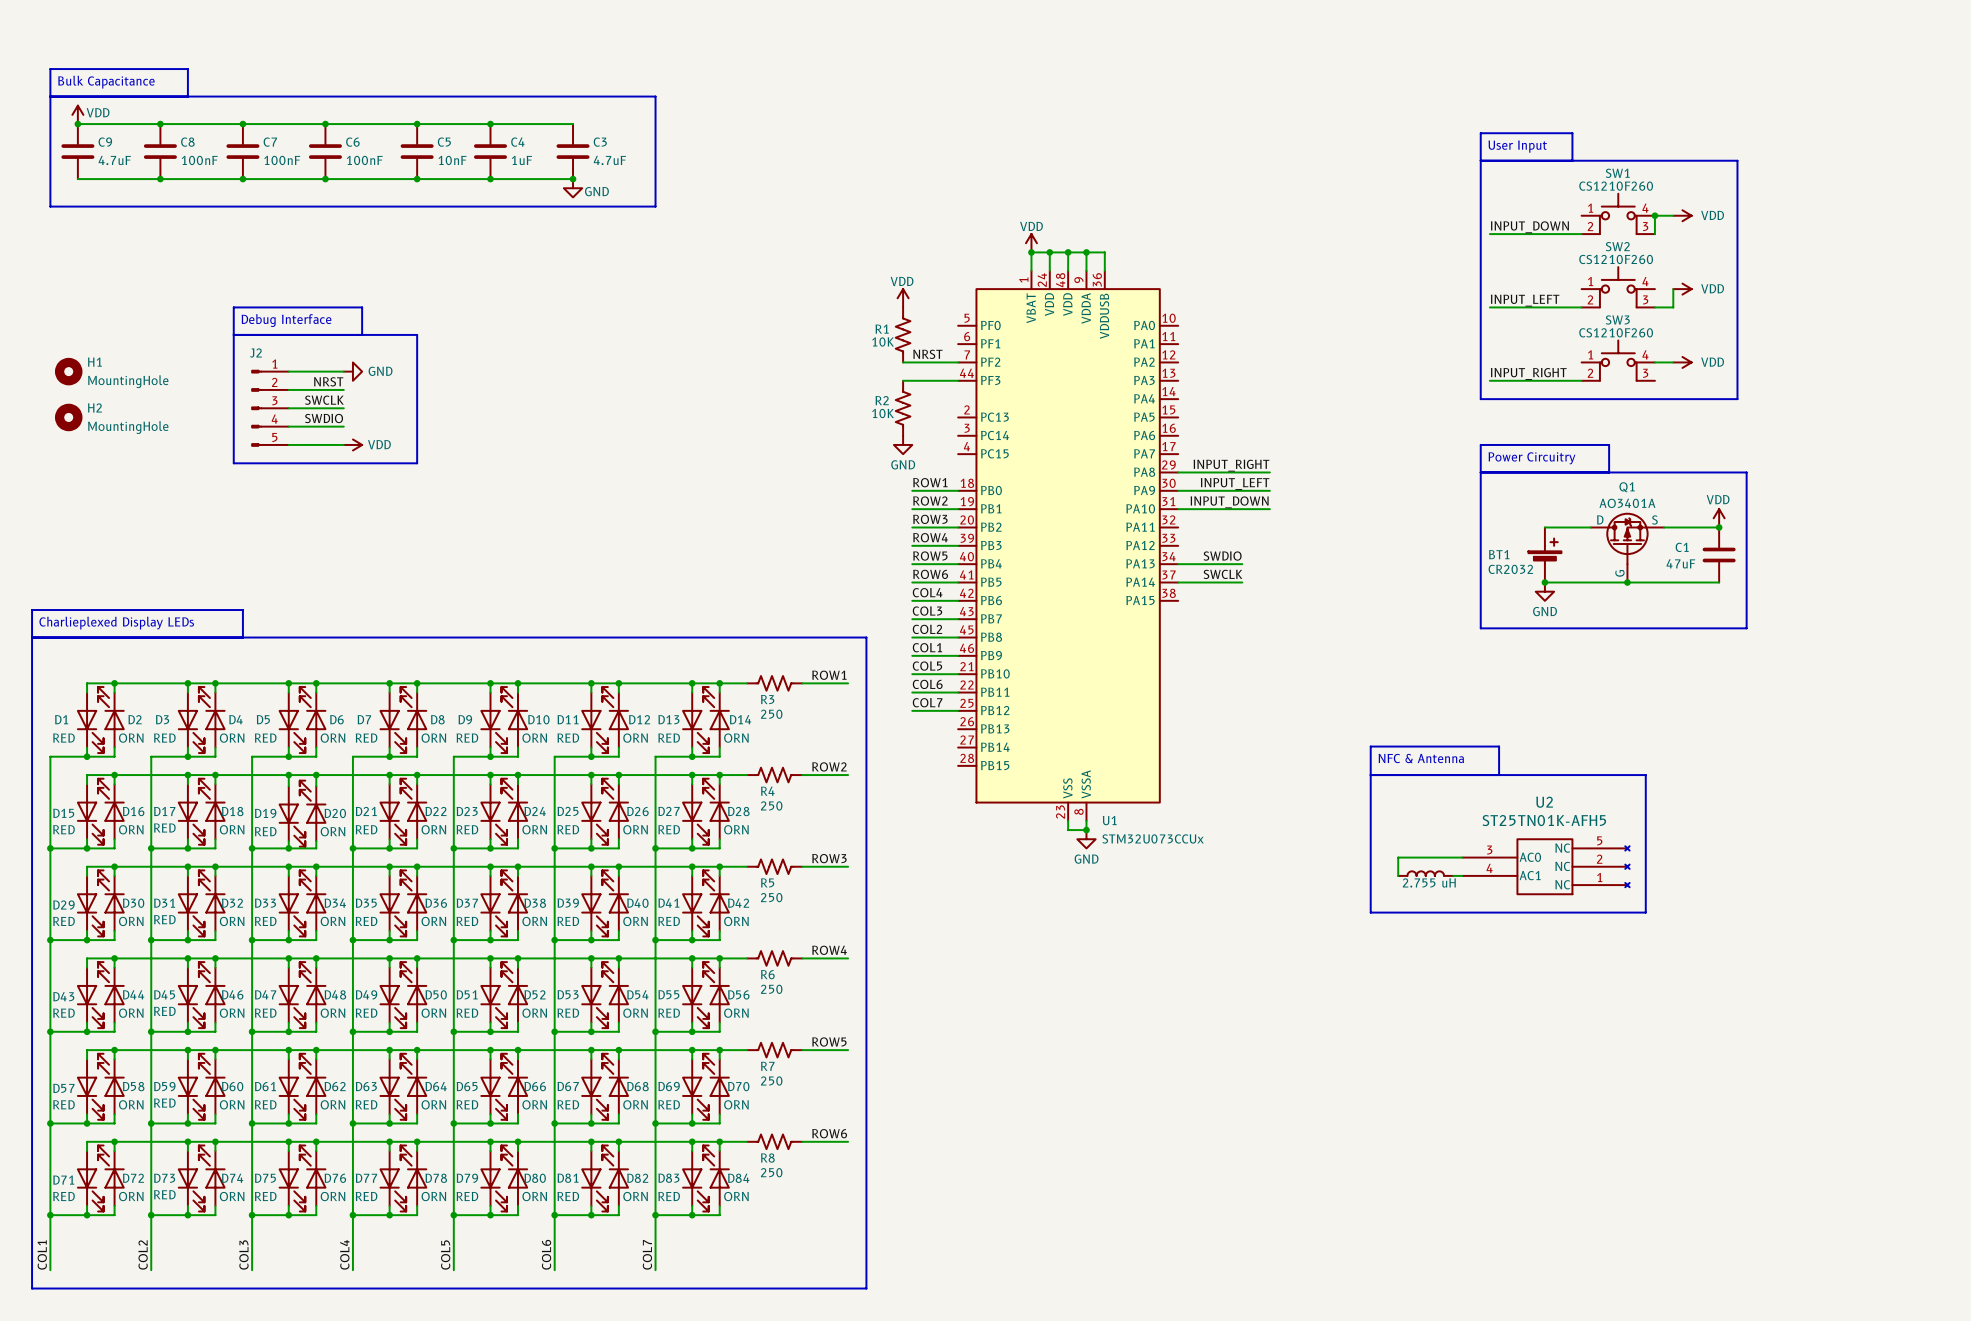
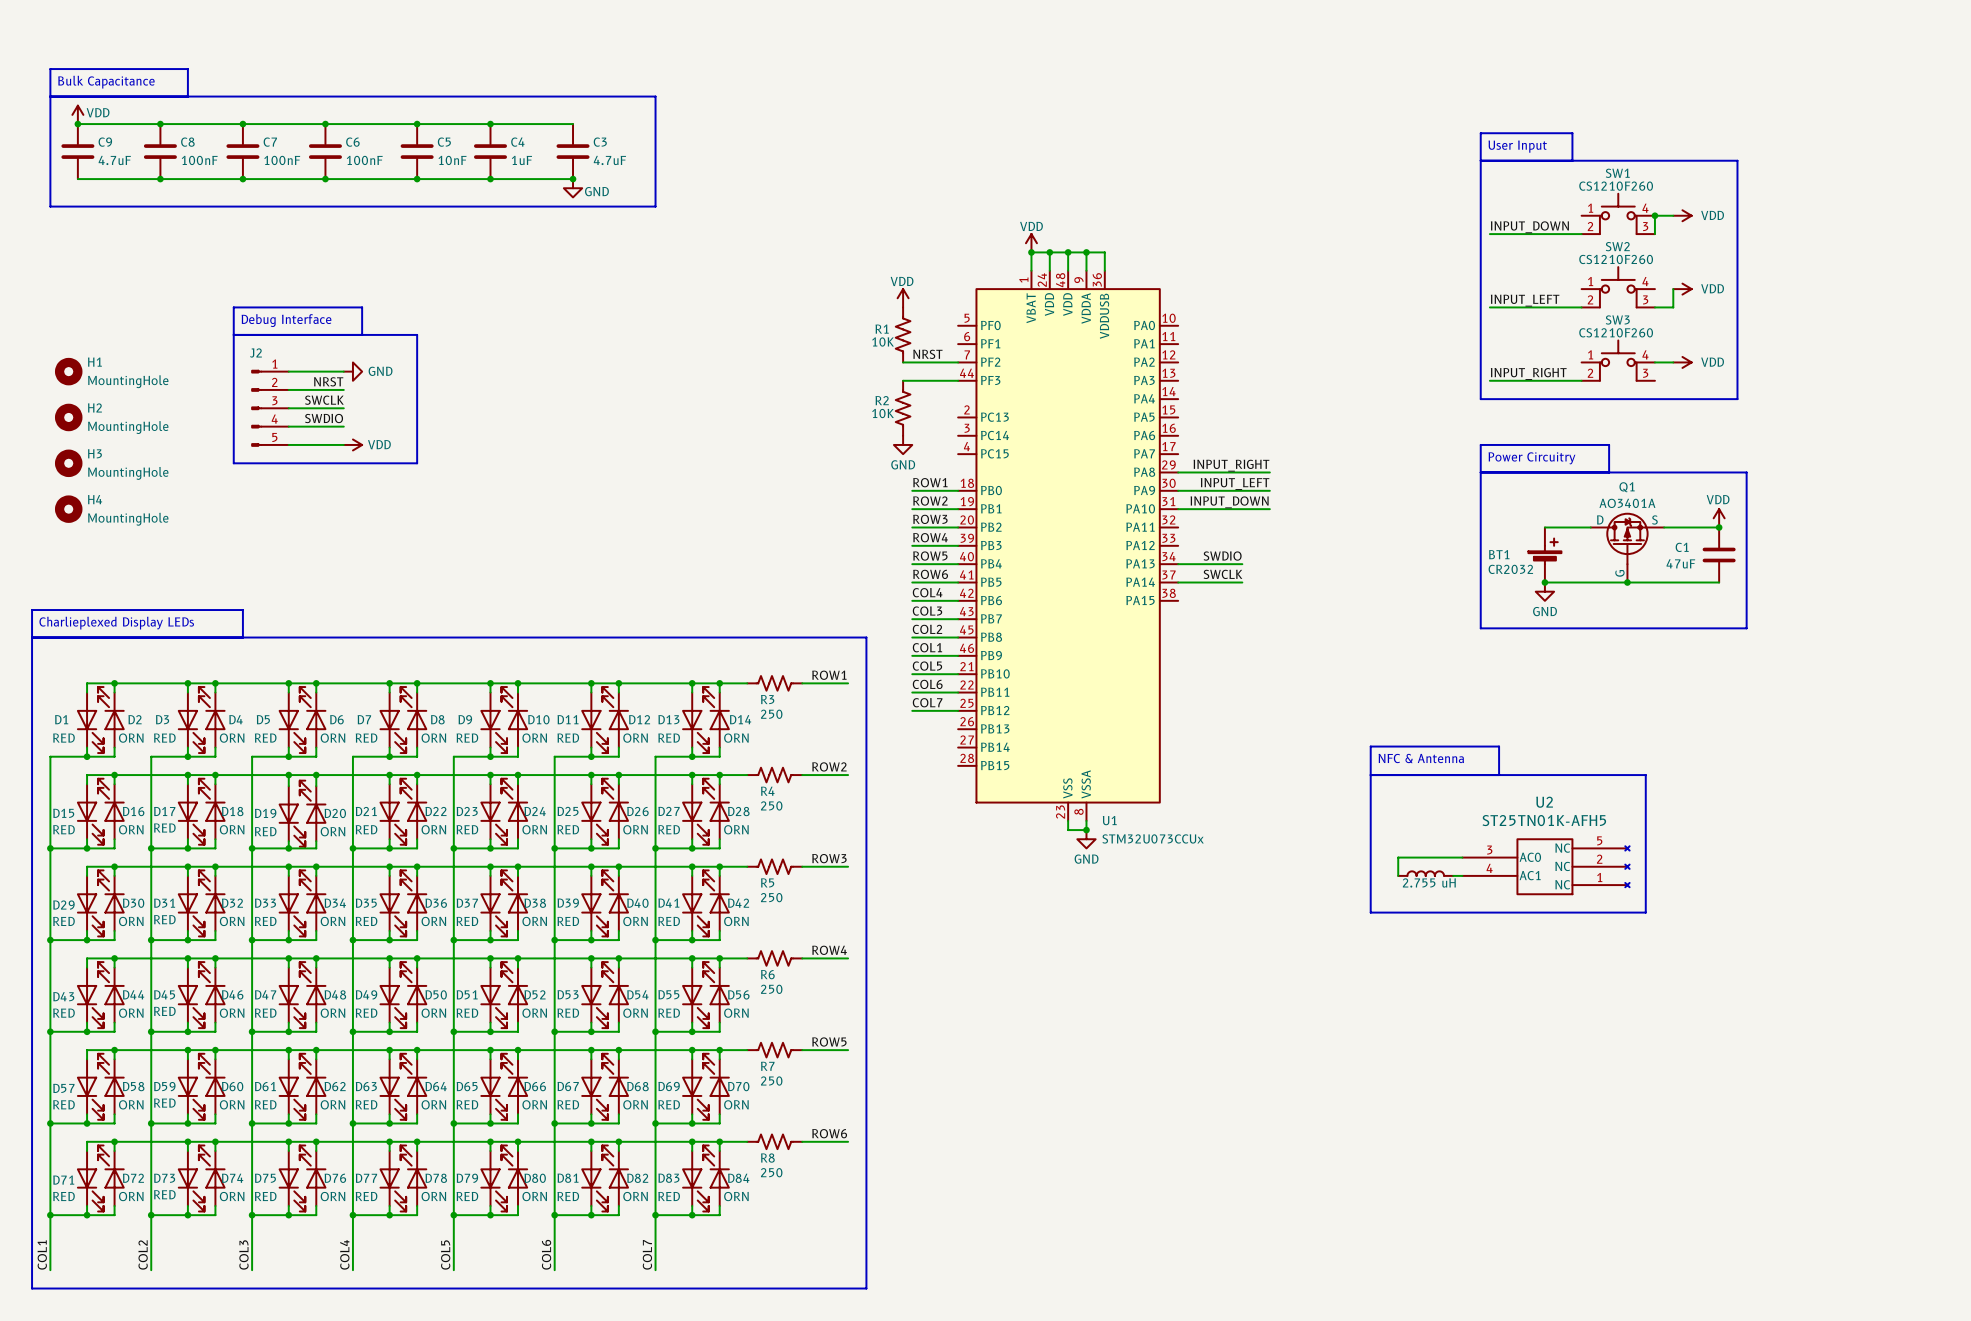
H3: none -> MountingHole (68, 463)
H4: none -> MountingHole (68, 509)

